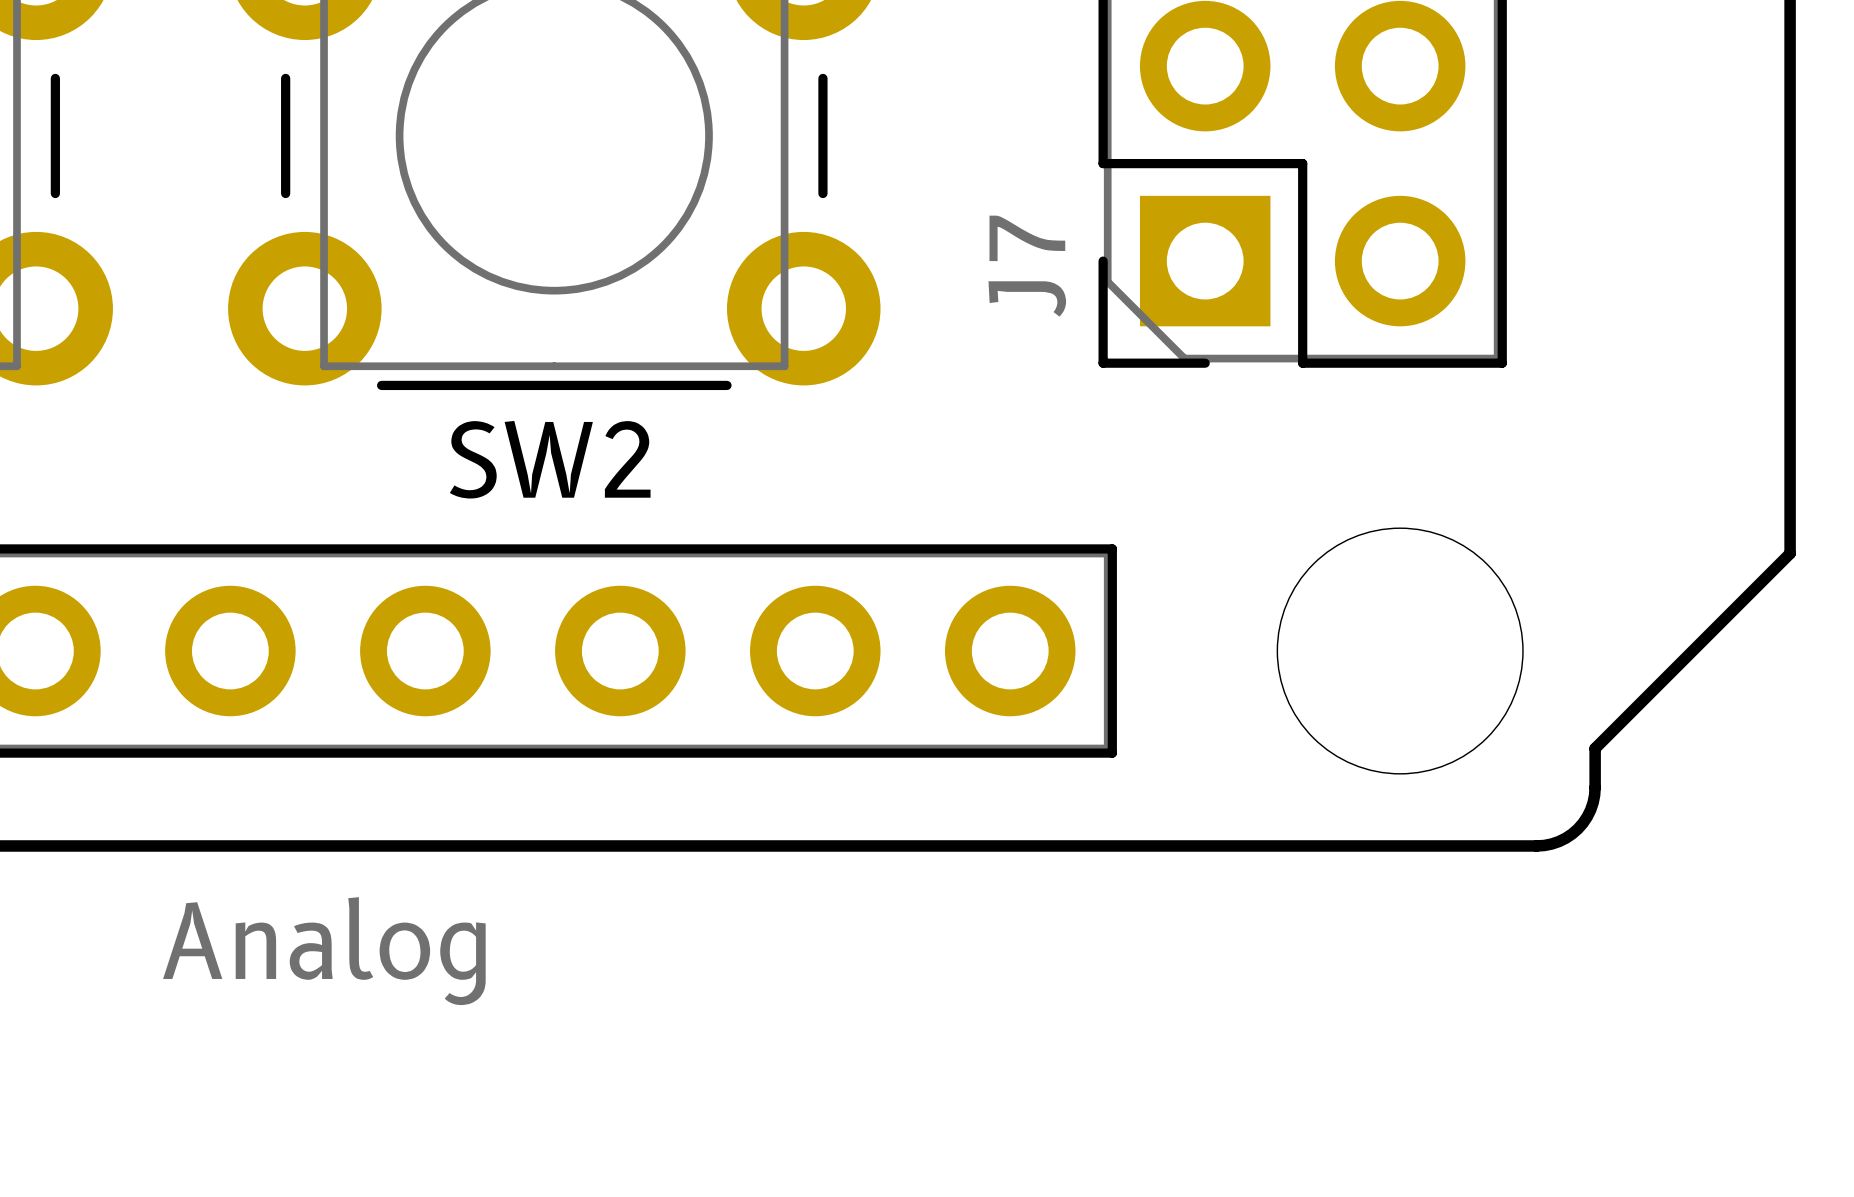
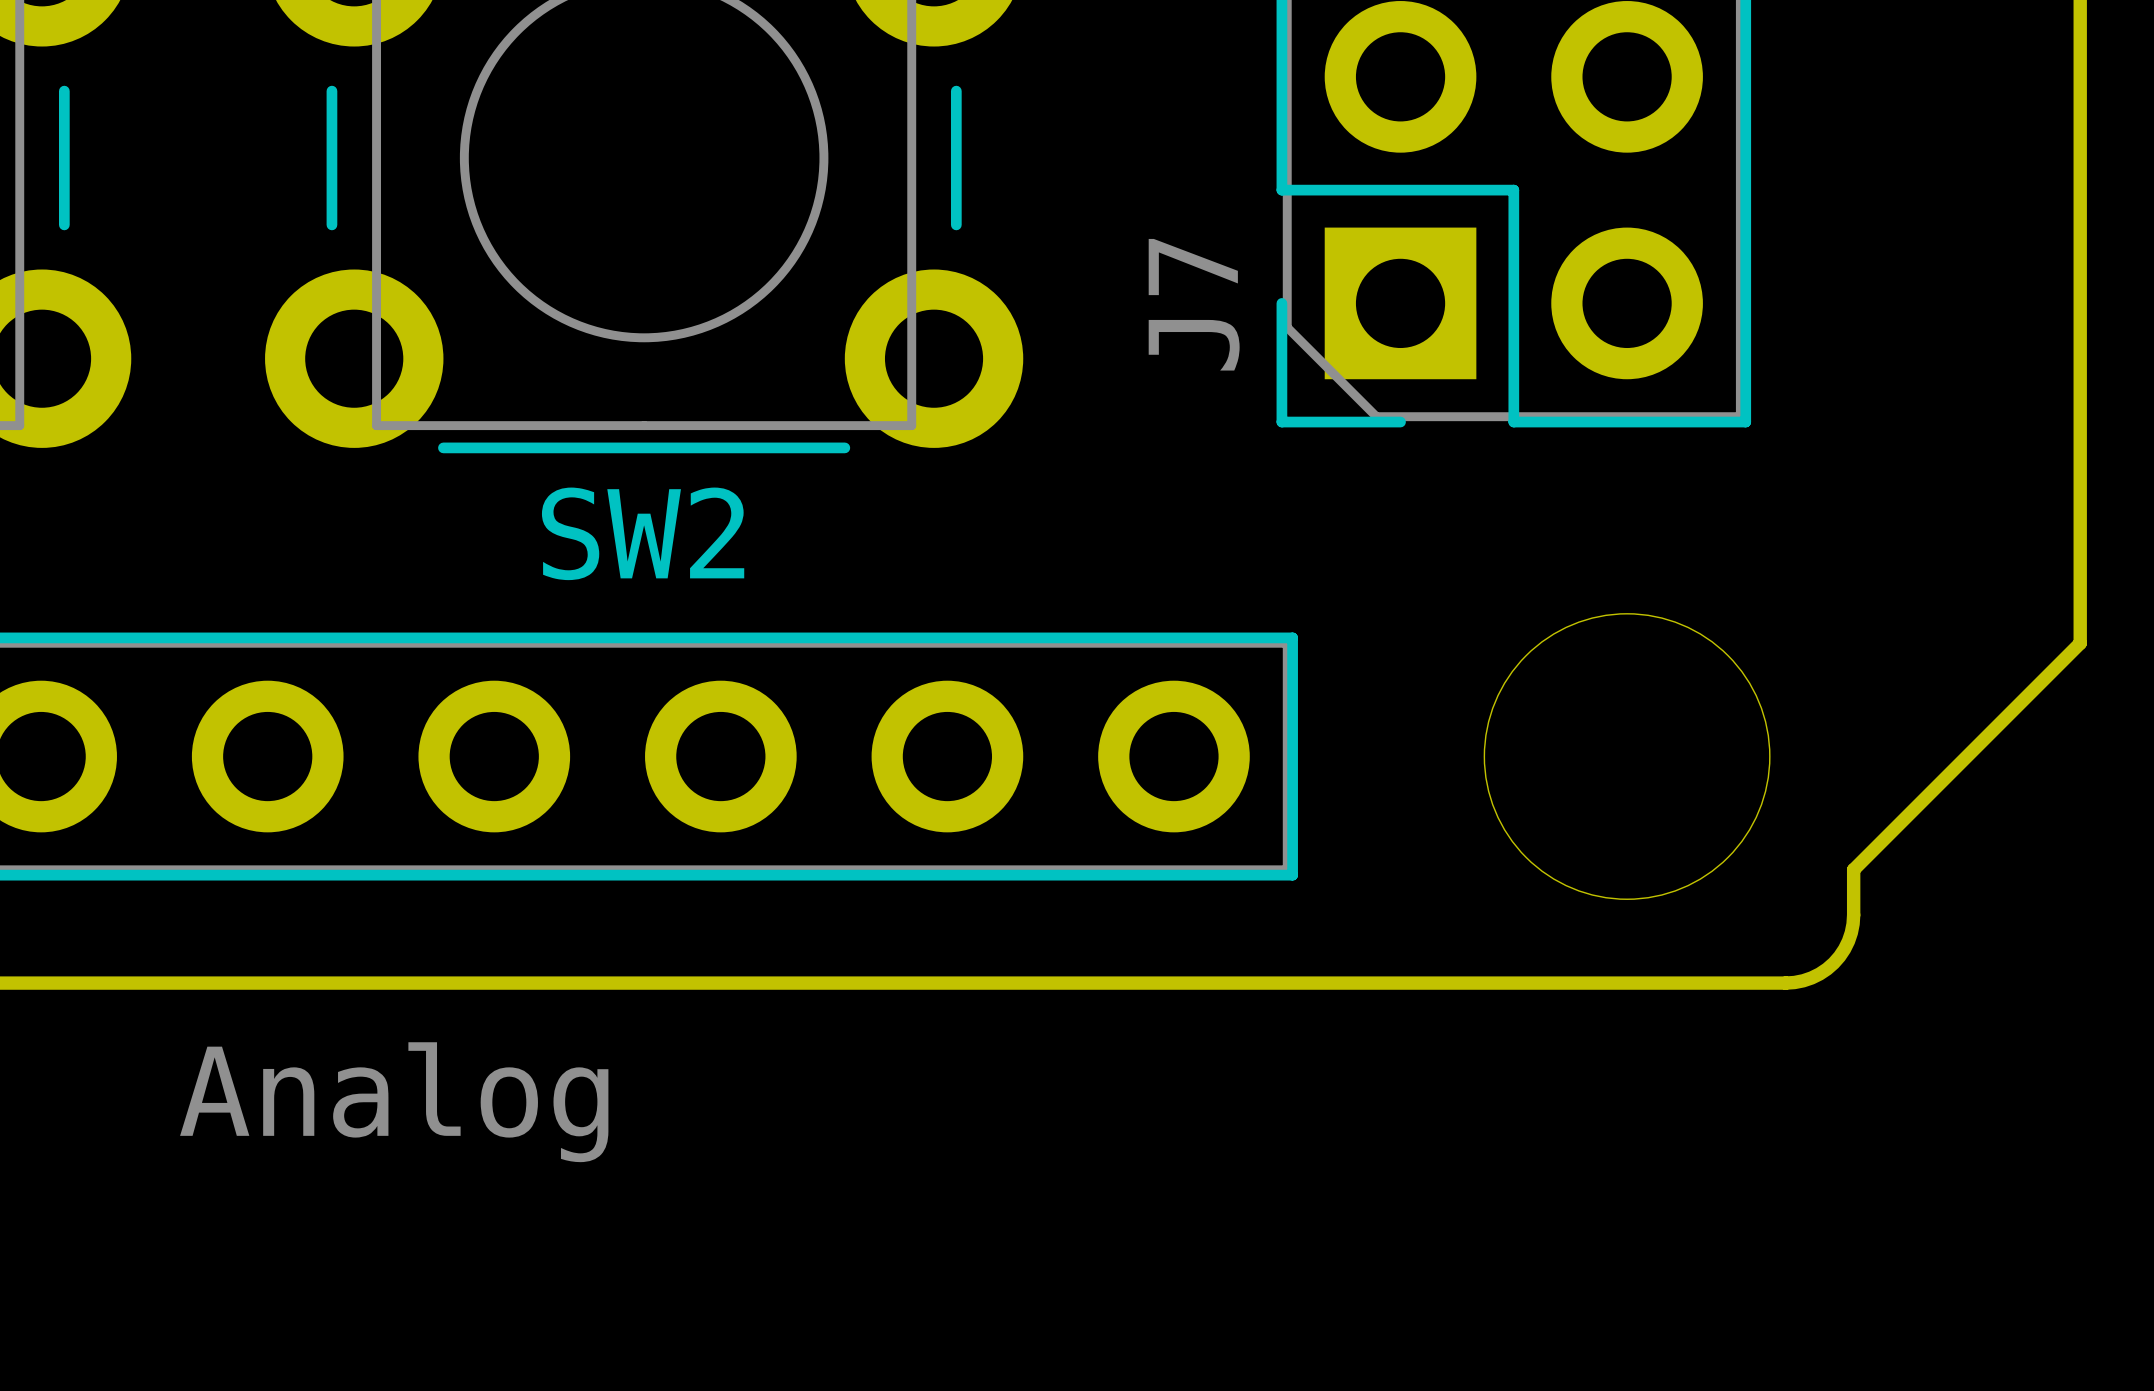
part value position: Analog (324, 951) -> Analog (394, 1102)

